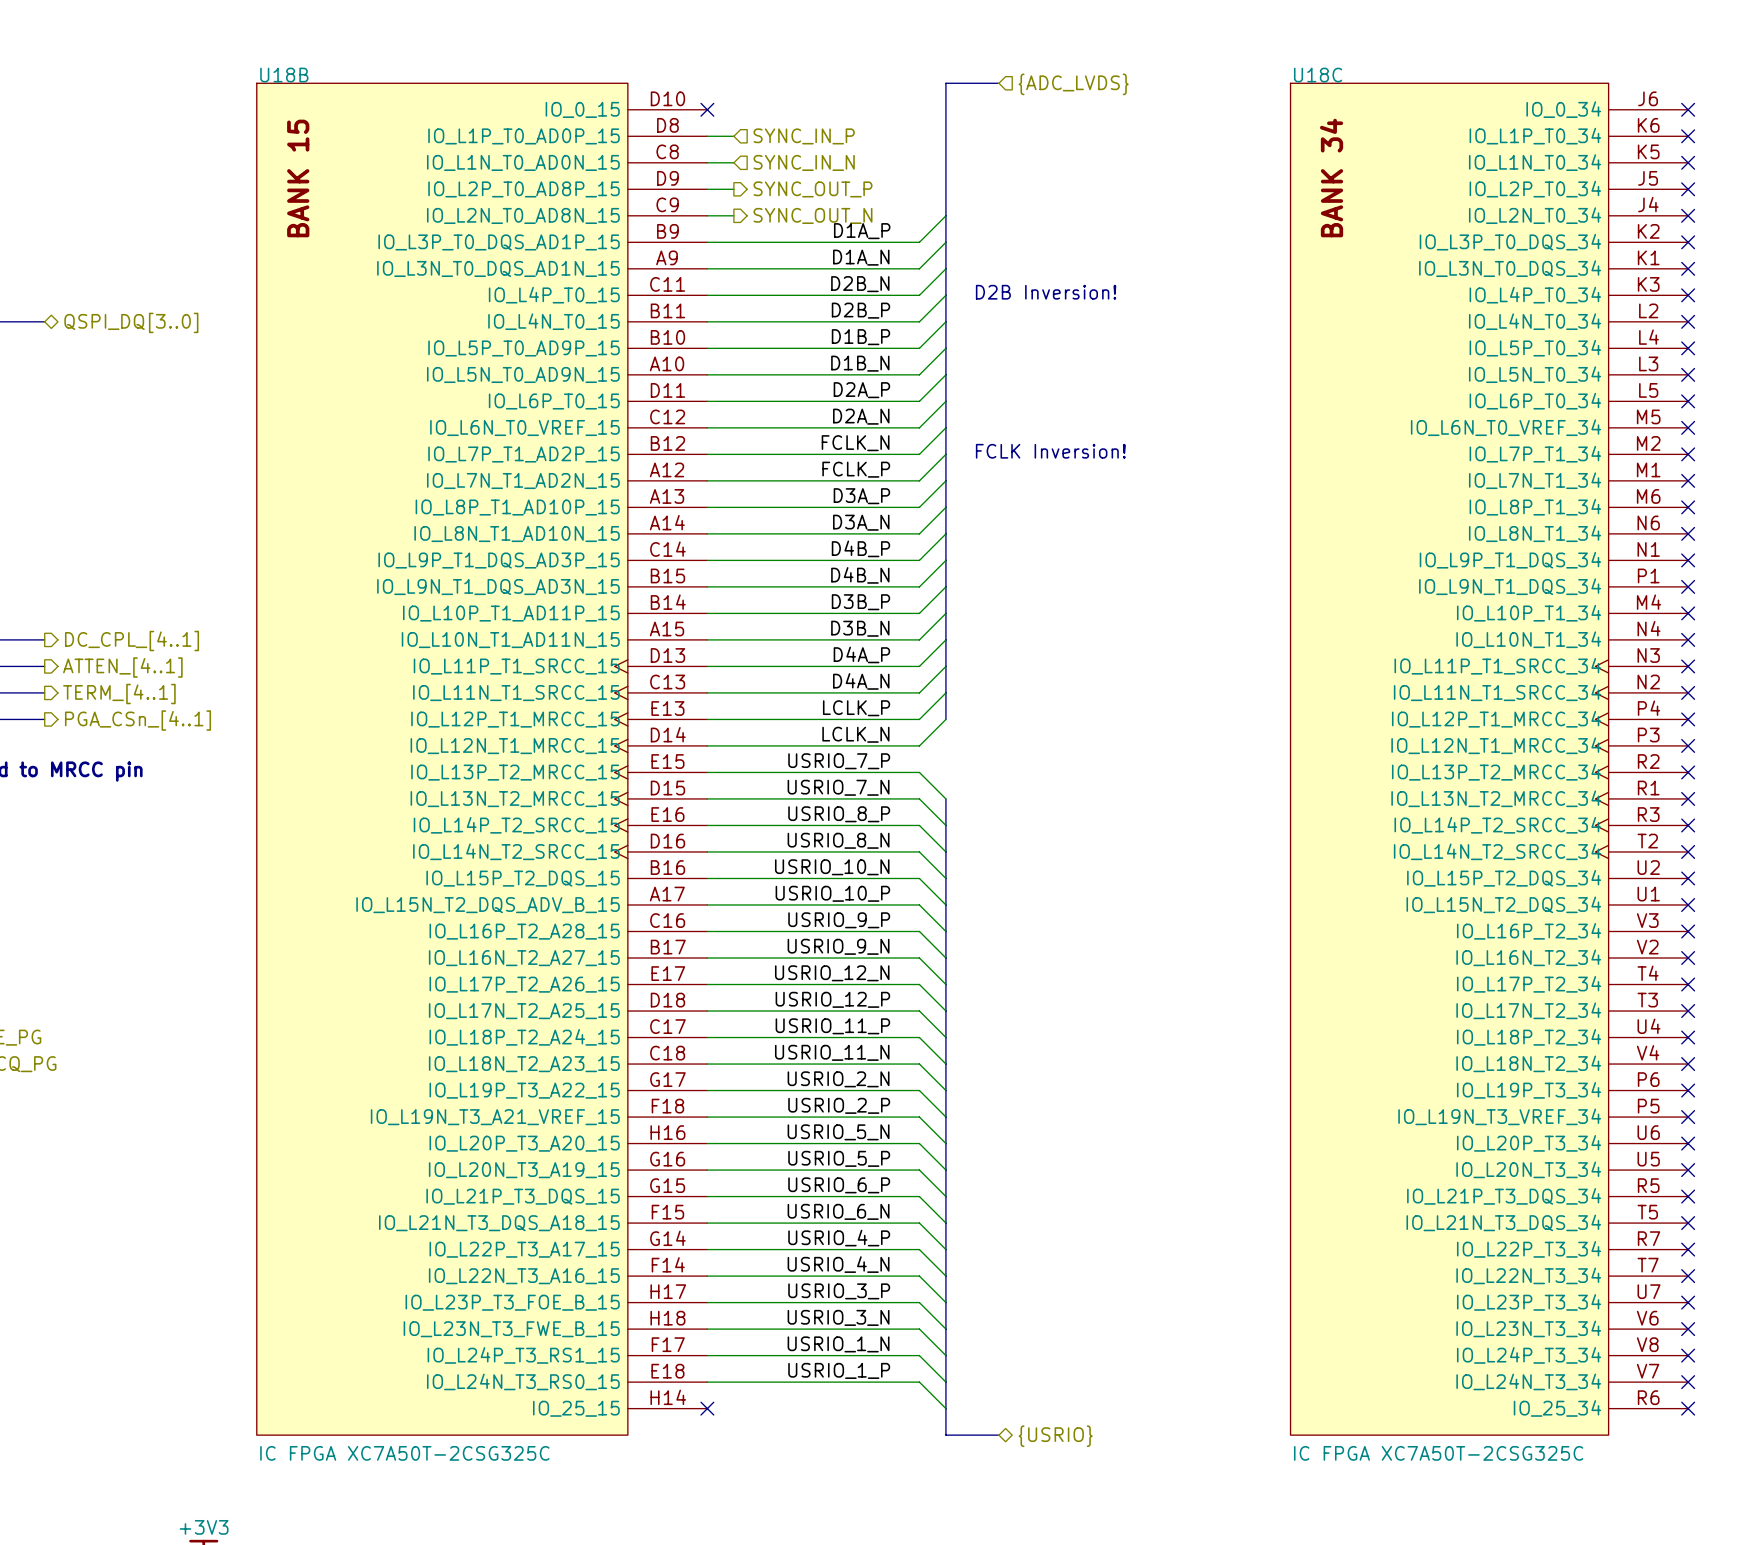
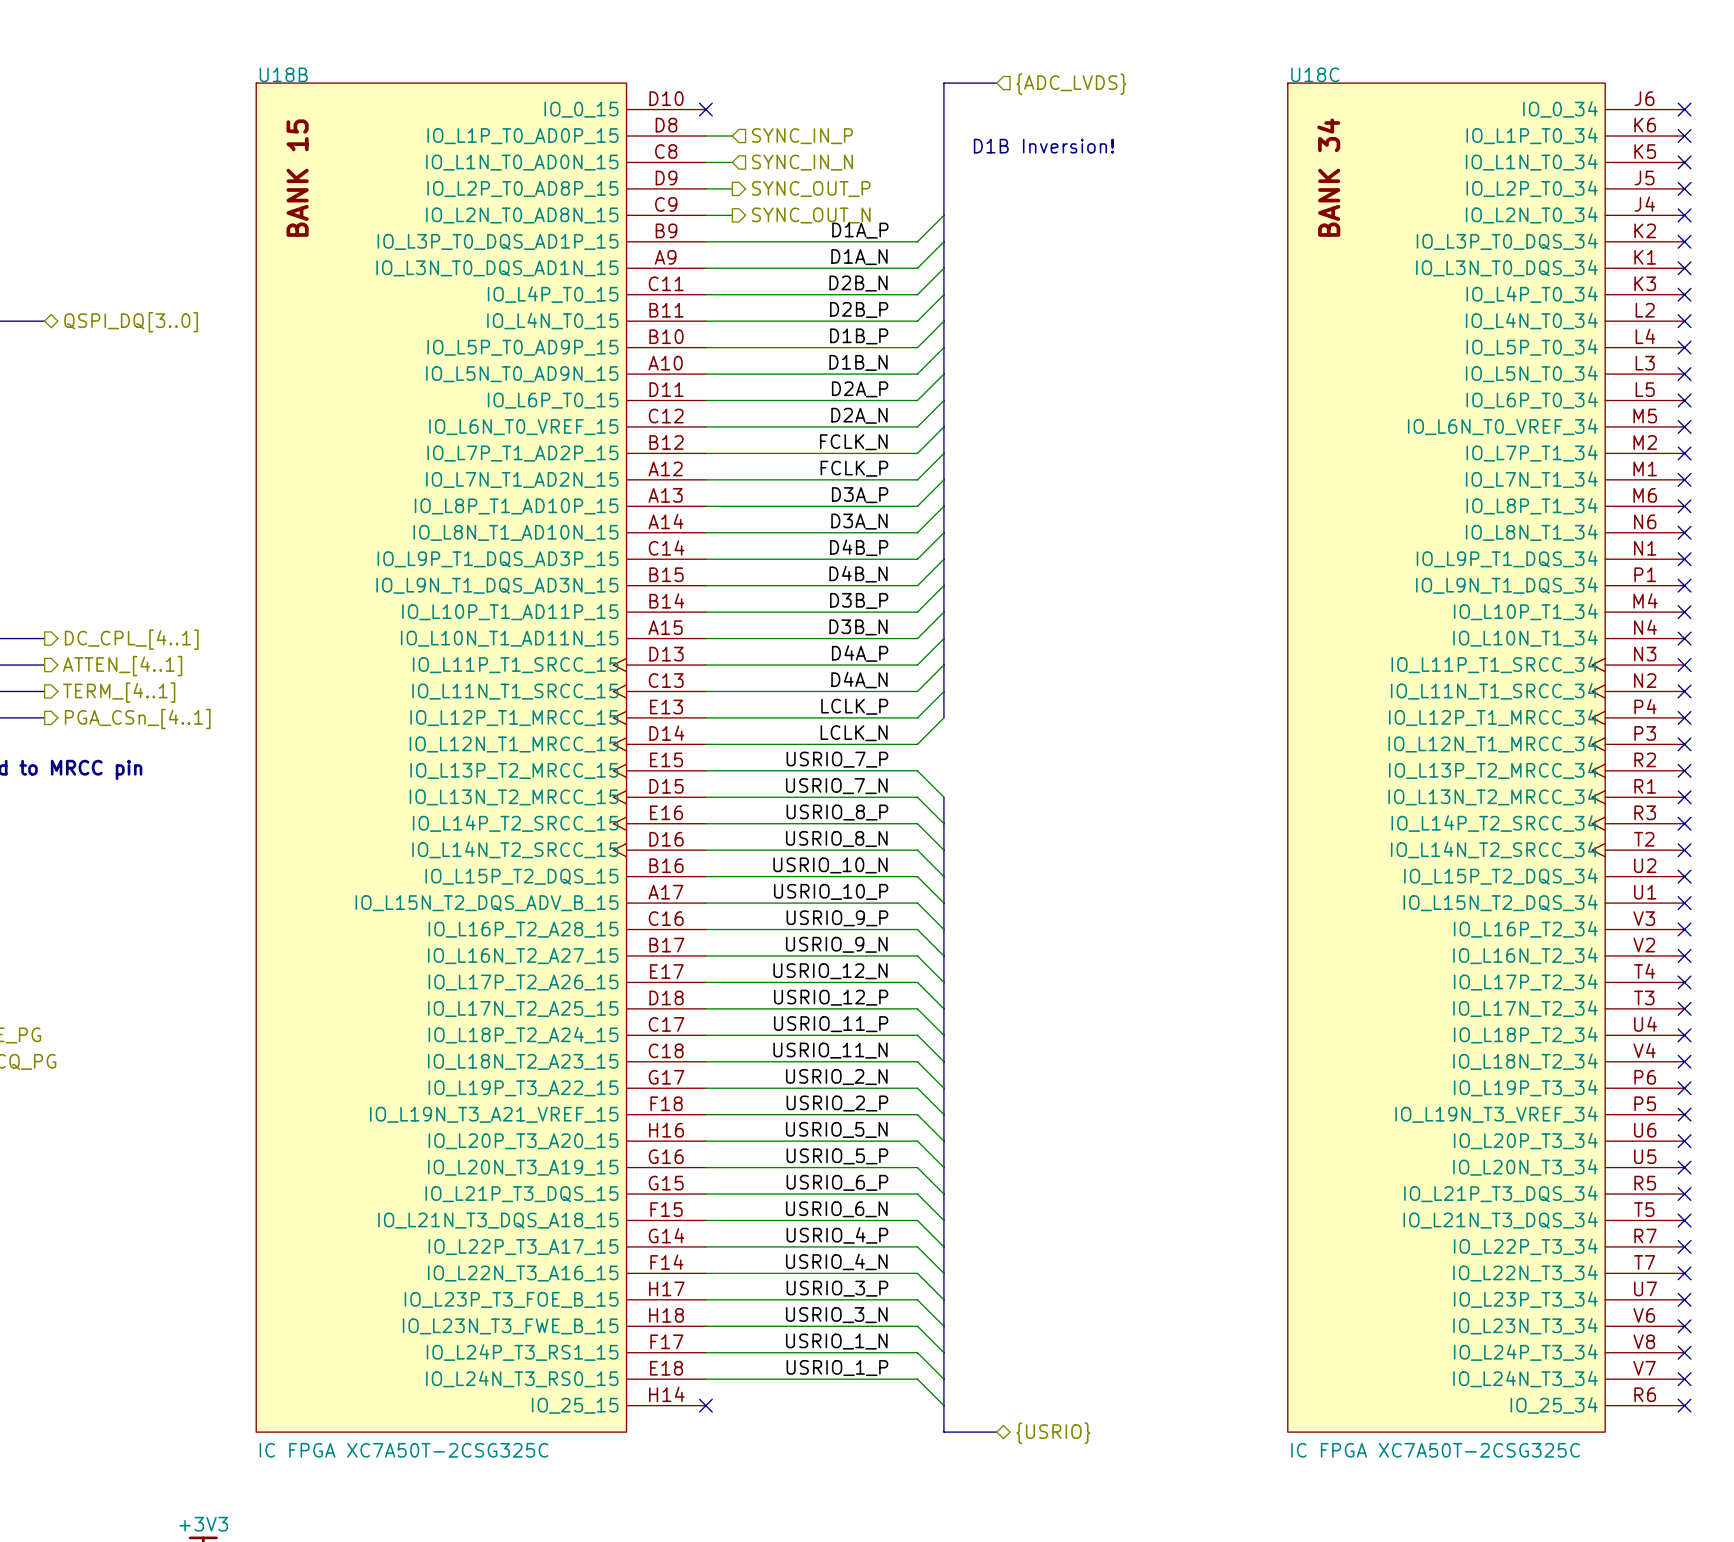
text: none -> D1B Inversion! (1043, 146)
text: D2B Inversion! (1046, 292) -> none
text: FCLK Inversion! (1050, 451) -> none

